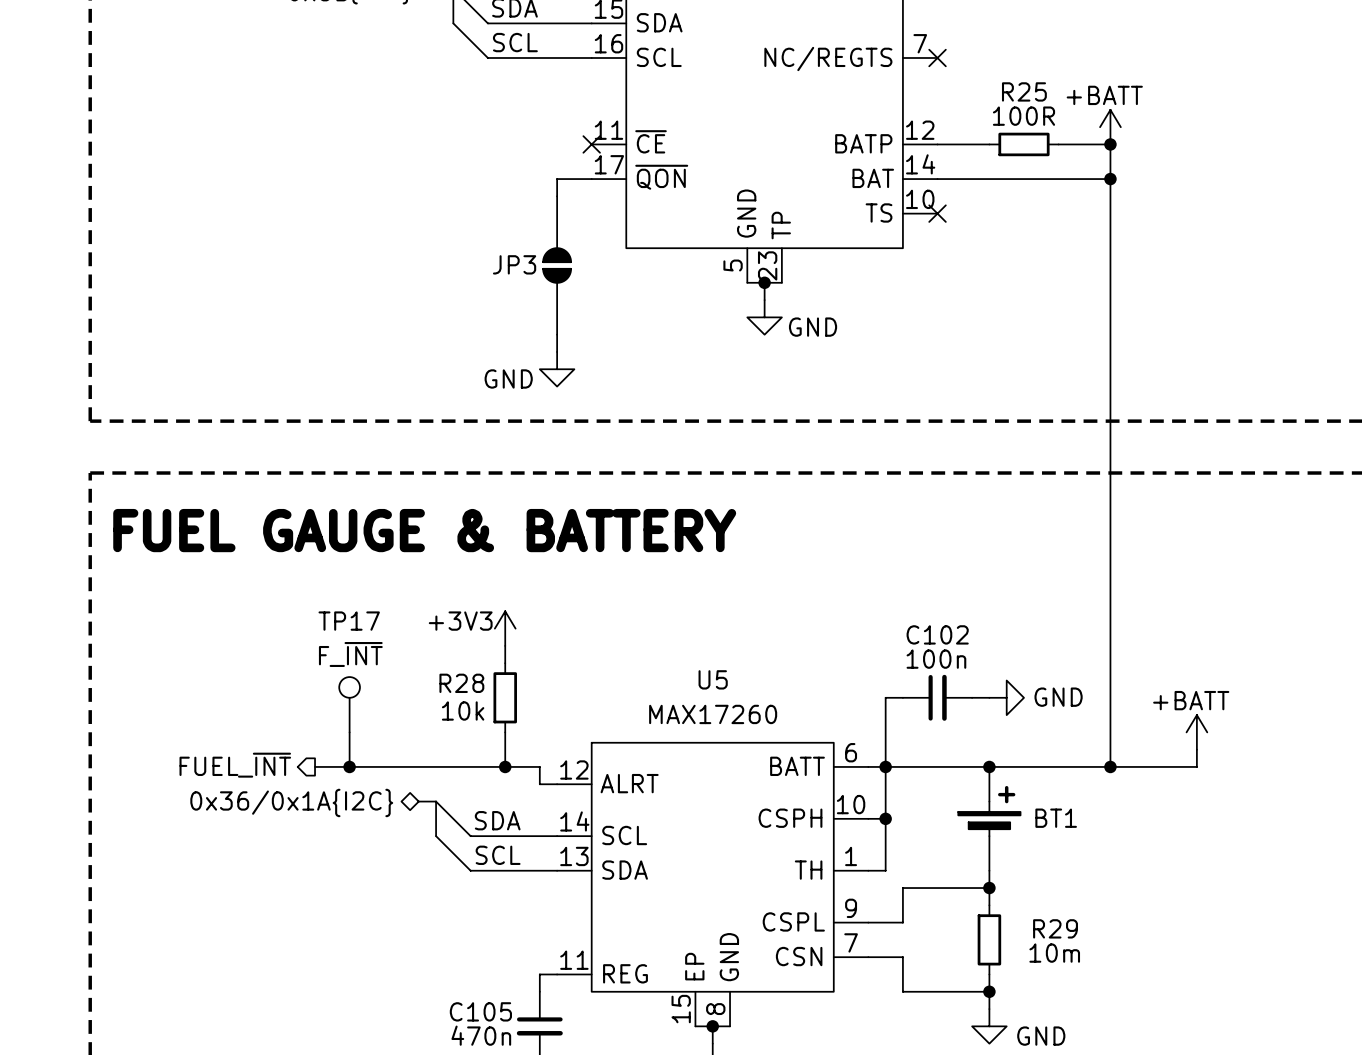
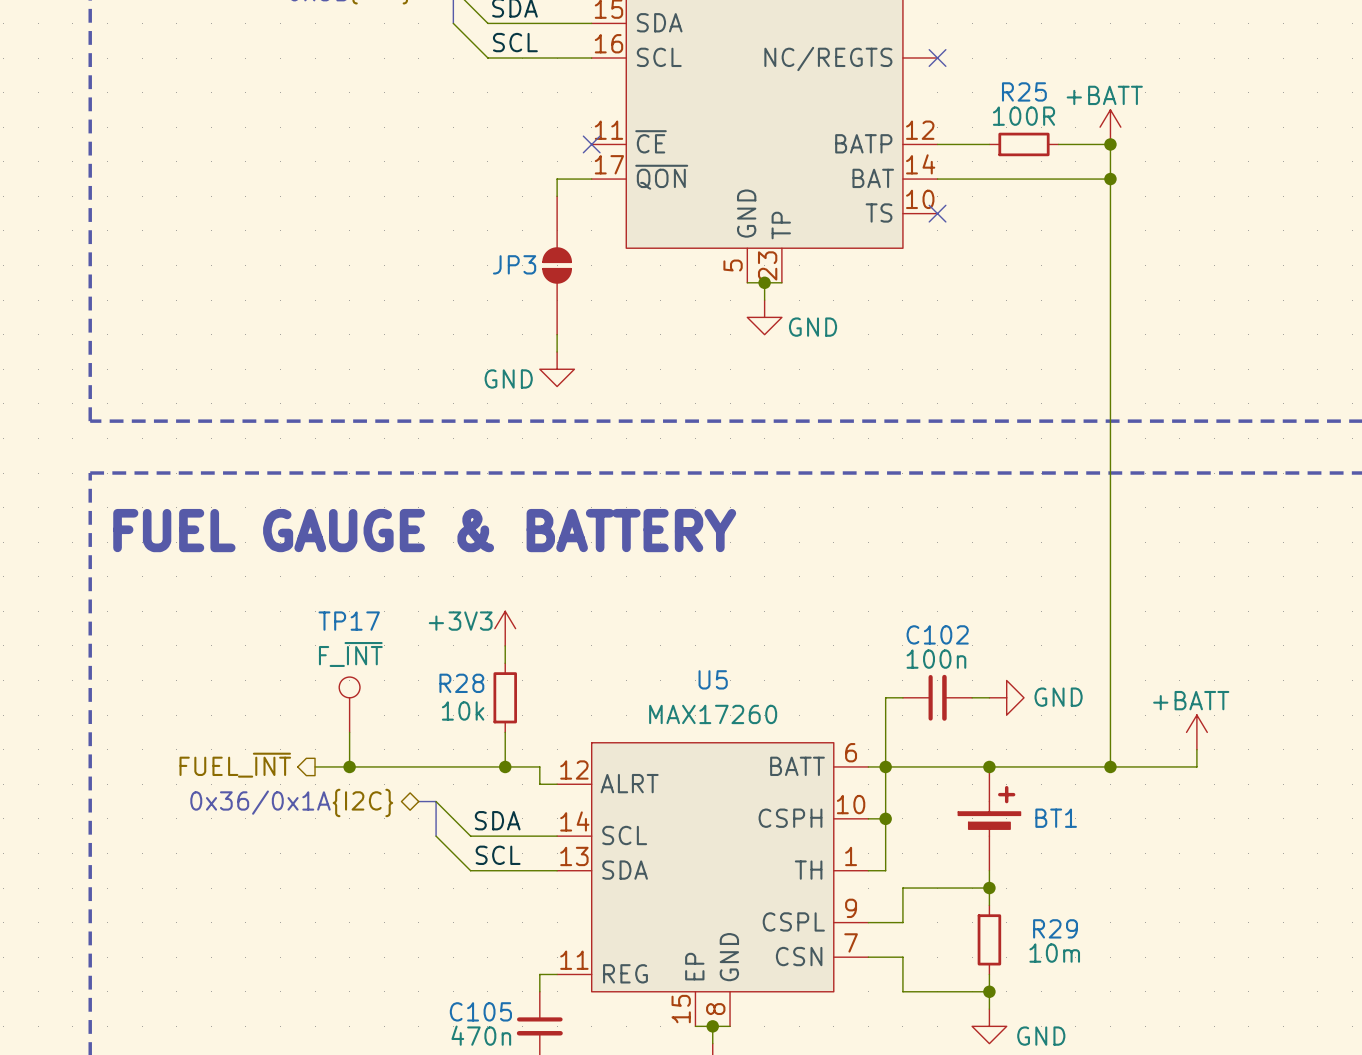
part pin number: 7 (920, 43) -> none

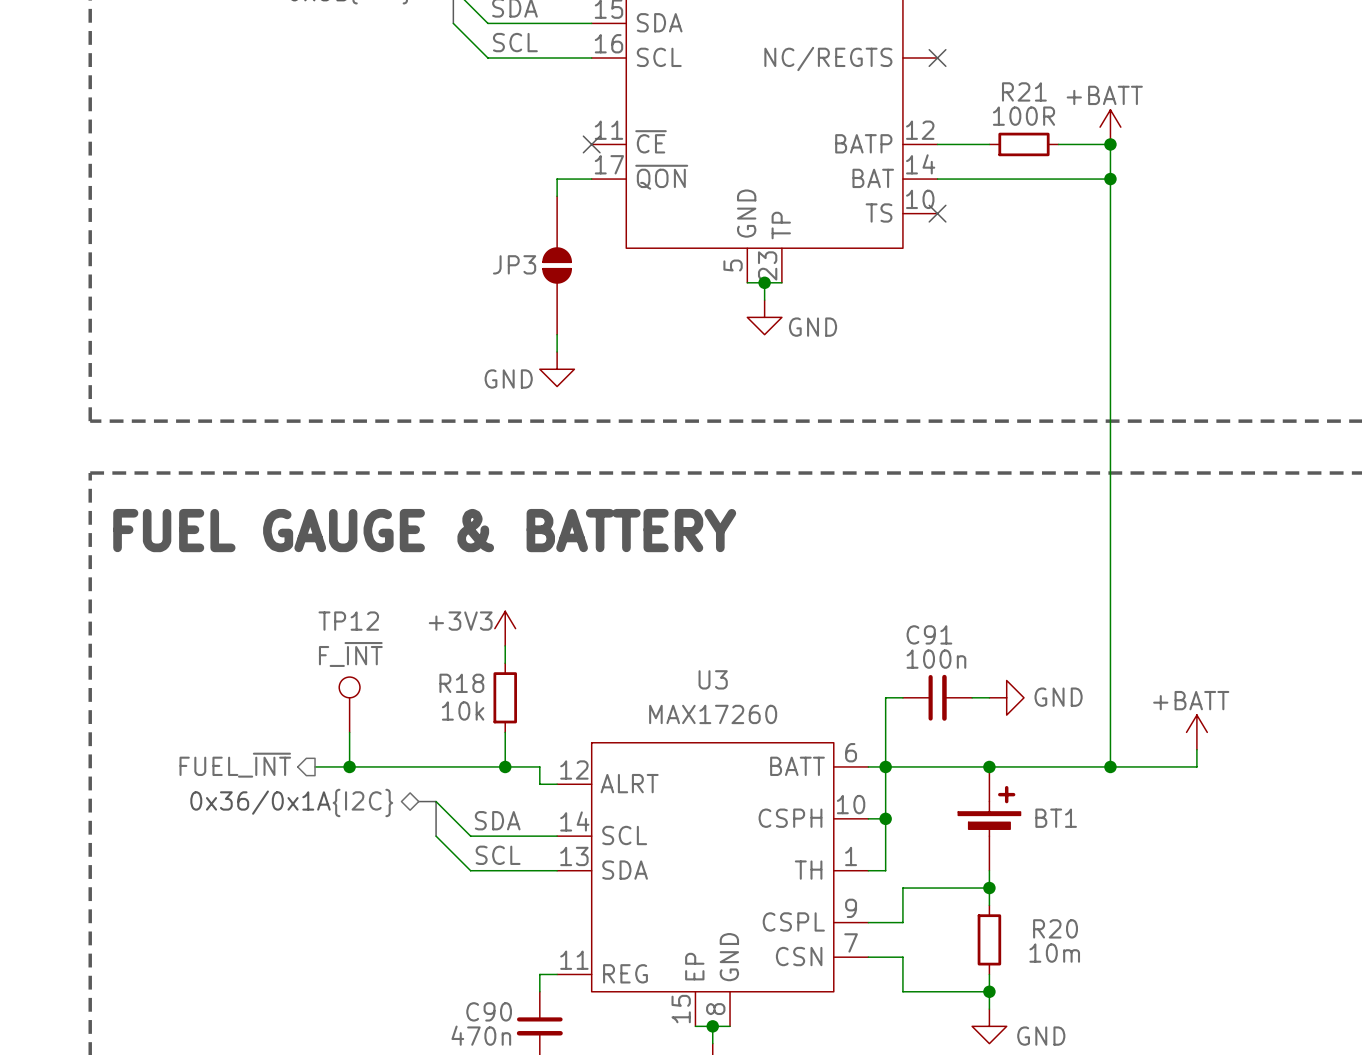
R25 name: R25 (1024, 91) -> R21 (1024, 91)
TP17 name: TP17 (349, 621) -> TP12 (348, 621)
C102 name: C102 (937, 634) -> C91 (929, 634)
U5 name: U5 (713, 679) -> U3 (713, 679)
R28 name: R28 (461, 683) -> R18 (461, 683)
R29 name: R29 (1055, 928) -> R20 (1055, 928)
C105 name: C105 (480, 1011) -> C90 (489, 1011)

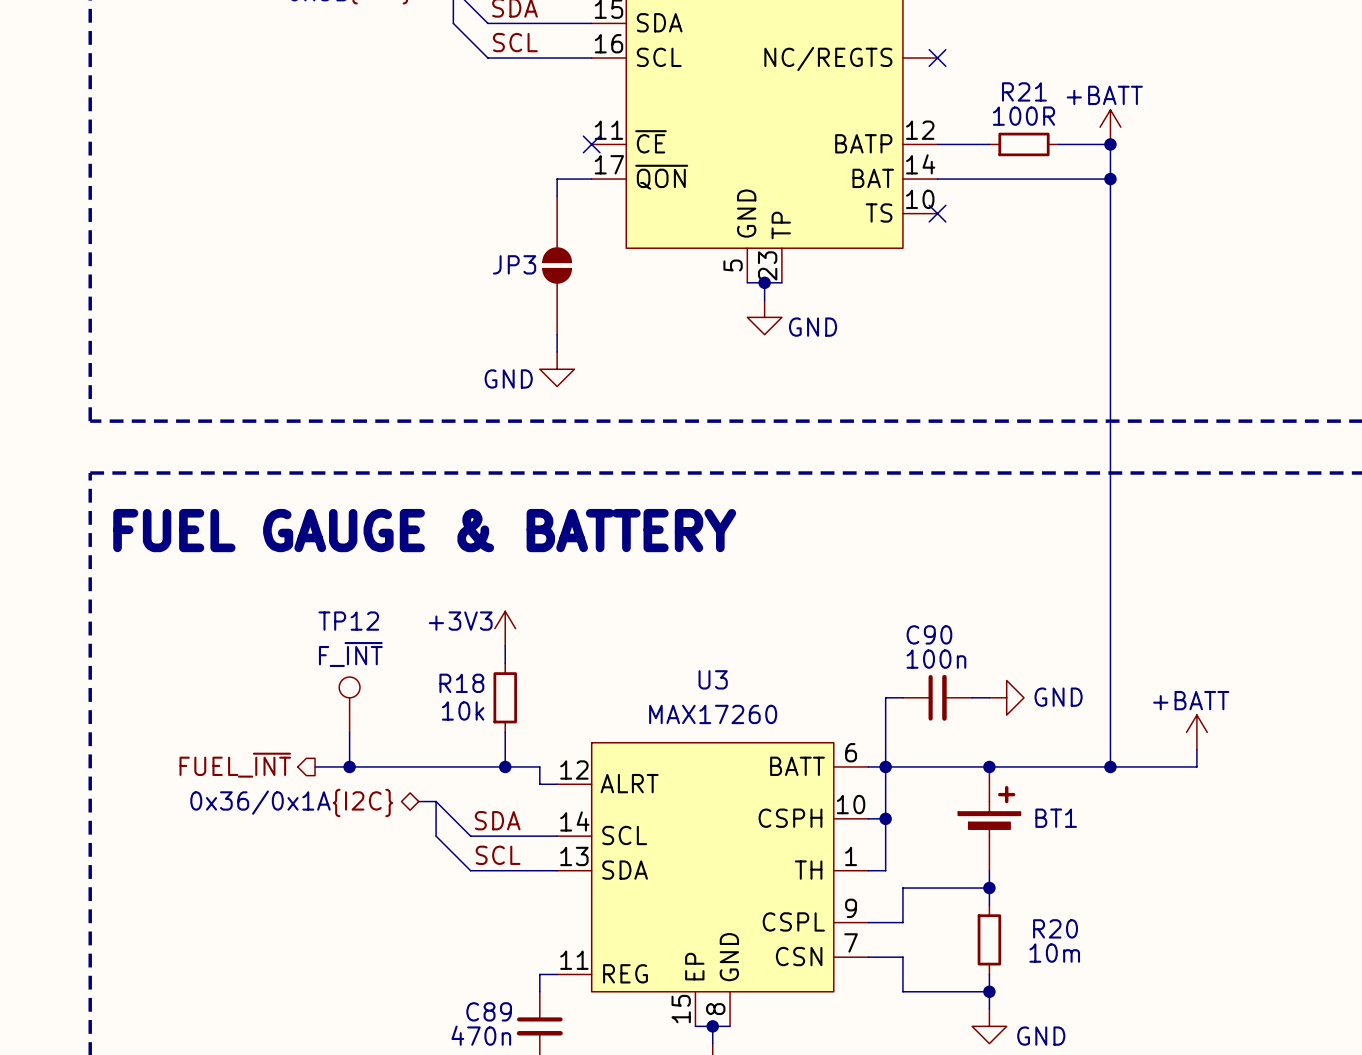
C91 name: C91 (929, 634) -> C90 (929, 634)
C90 name: C90 (489, 1011) -> C89 (489, 1011)

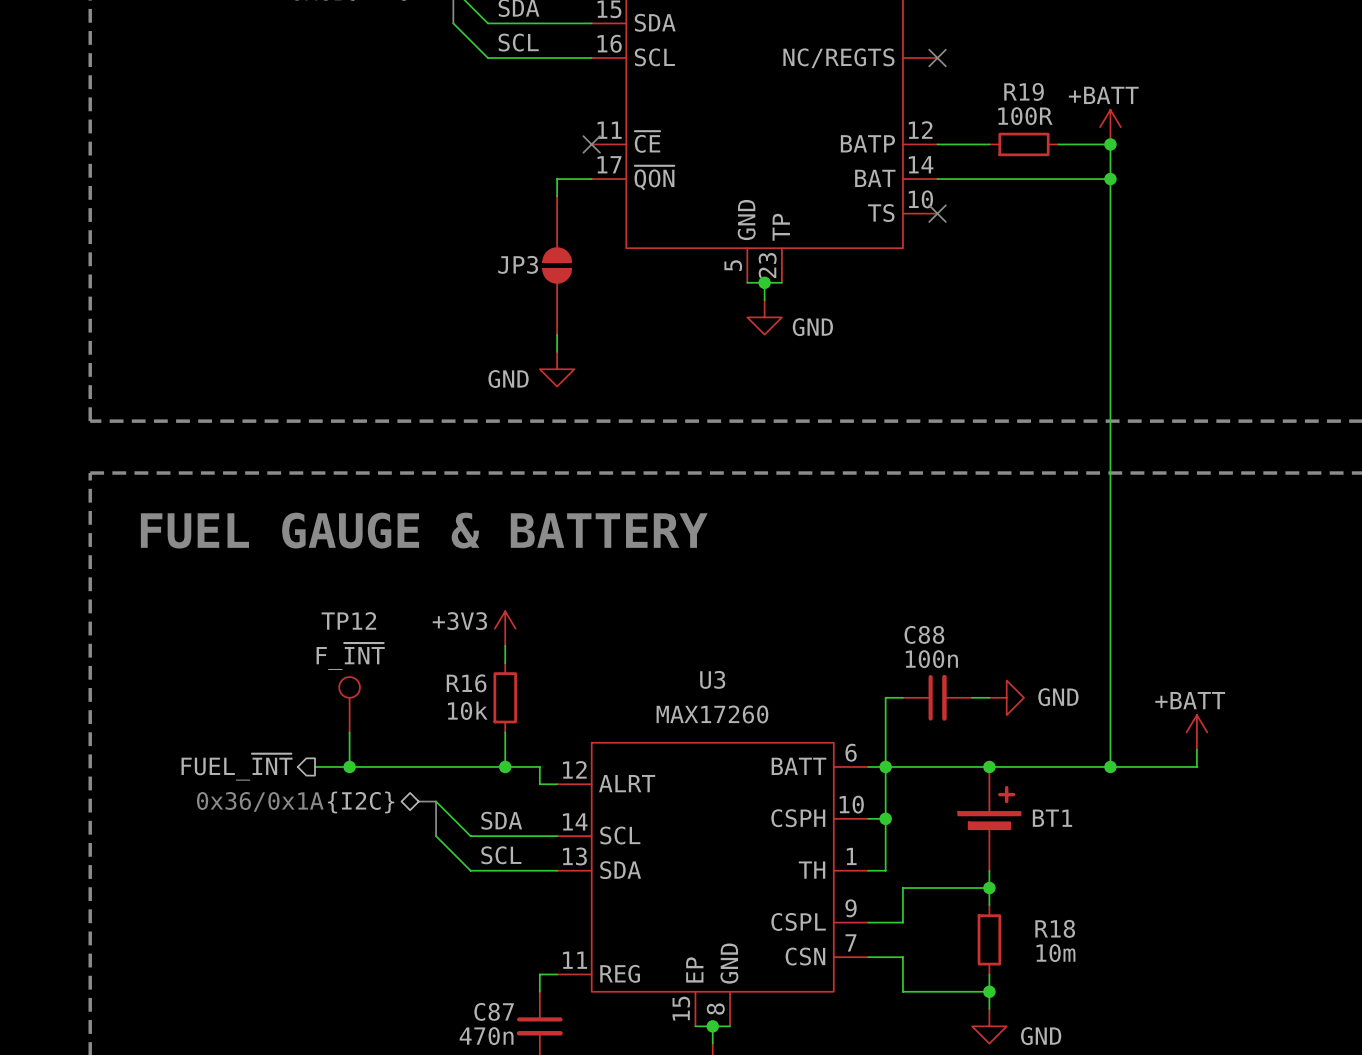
R21 name: R21 (1024, 91) -> R19 (1024, 91)
C90 name: C90 (929, 634) -> C88 (924, 634)
R18 name: R18 (461, 683) -> R16 (466, 683)
R20 name: R20 (1055, 928) -> R18 (1055, 928)
C89 name: C89 (489, 1011) -> C87 (494, 1011)

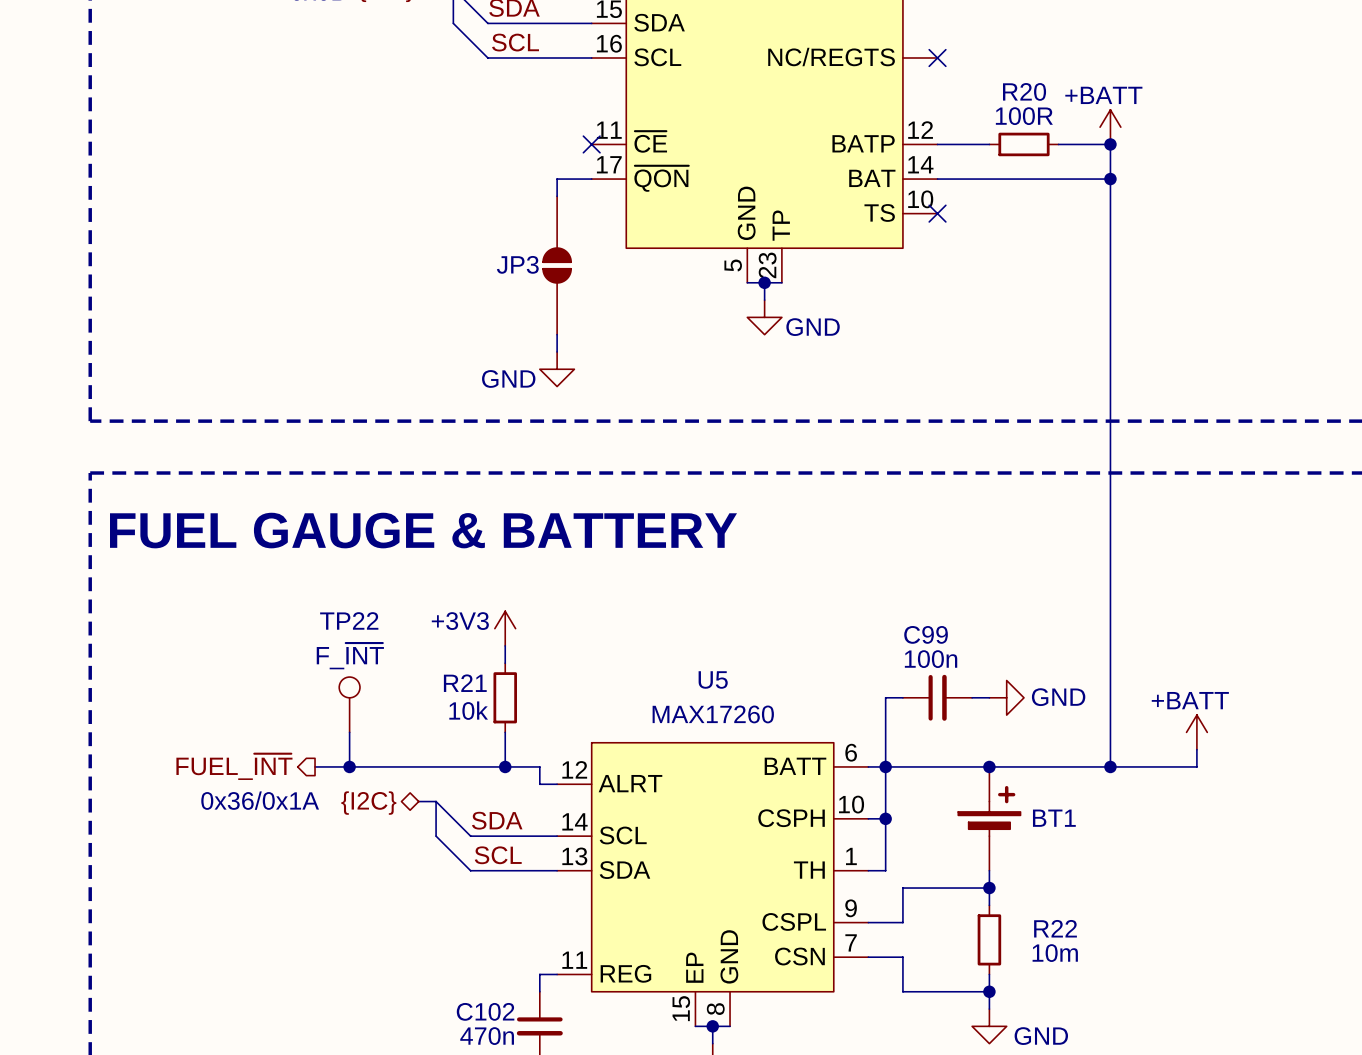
R19 name: R19 (1024, 91) -> R20 (1024, 91)
TP12 name: TP12 (348, 620) -> TP22 (349, 620)
C88 name: C88 (924, 634) -> C99 (926, 634)
U3 name: U3 (712, 679) -> U5 (713, 679)
R16 name: R16 (466, 683) -> R21 (465, 683)
R18 name: R18 (1055, 928) -> R22 (1055, 928)
C87 name: C87 (494, 1011) -> C102 (485, 1011)

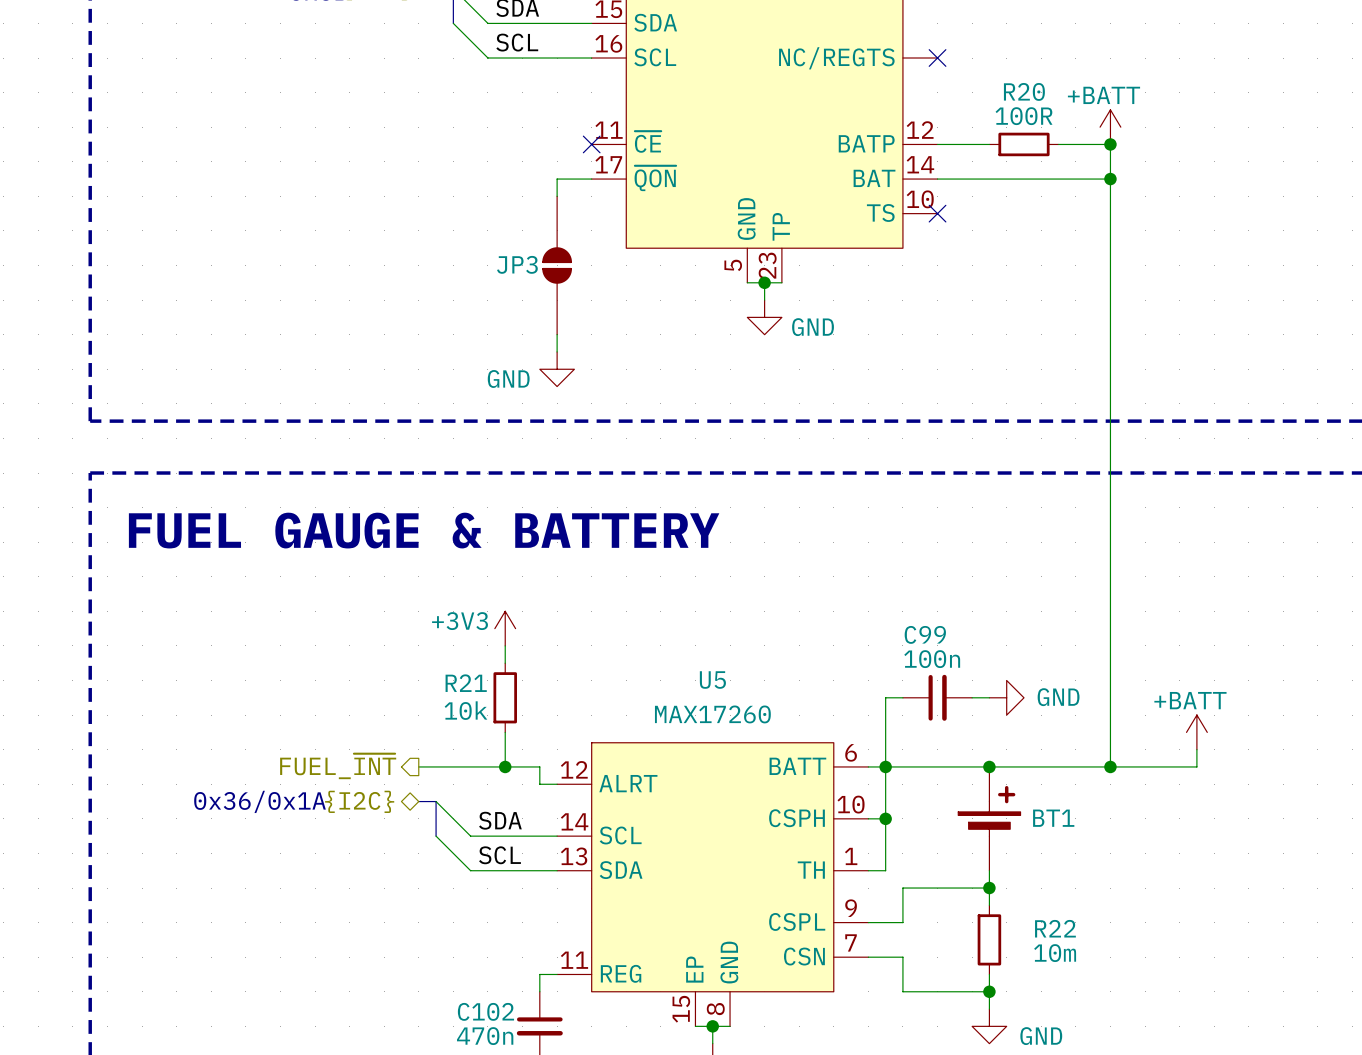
TP22: F_~{INT} (349, 704) -> none
wire: (349, 732) (349, 766) -> none
hierarchical label position: FUEL_~{INT} (234, 766) -> FUEL_~{INT} (338, 766)
wire: (315, 766) (418, 766) -> none
junction: (349, 766) -> none

